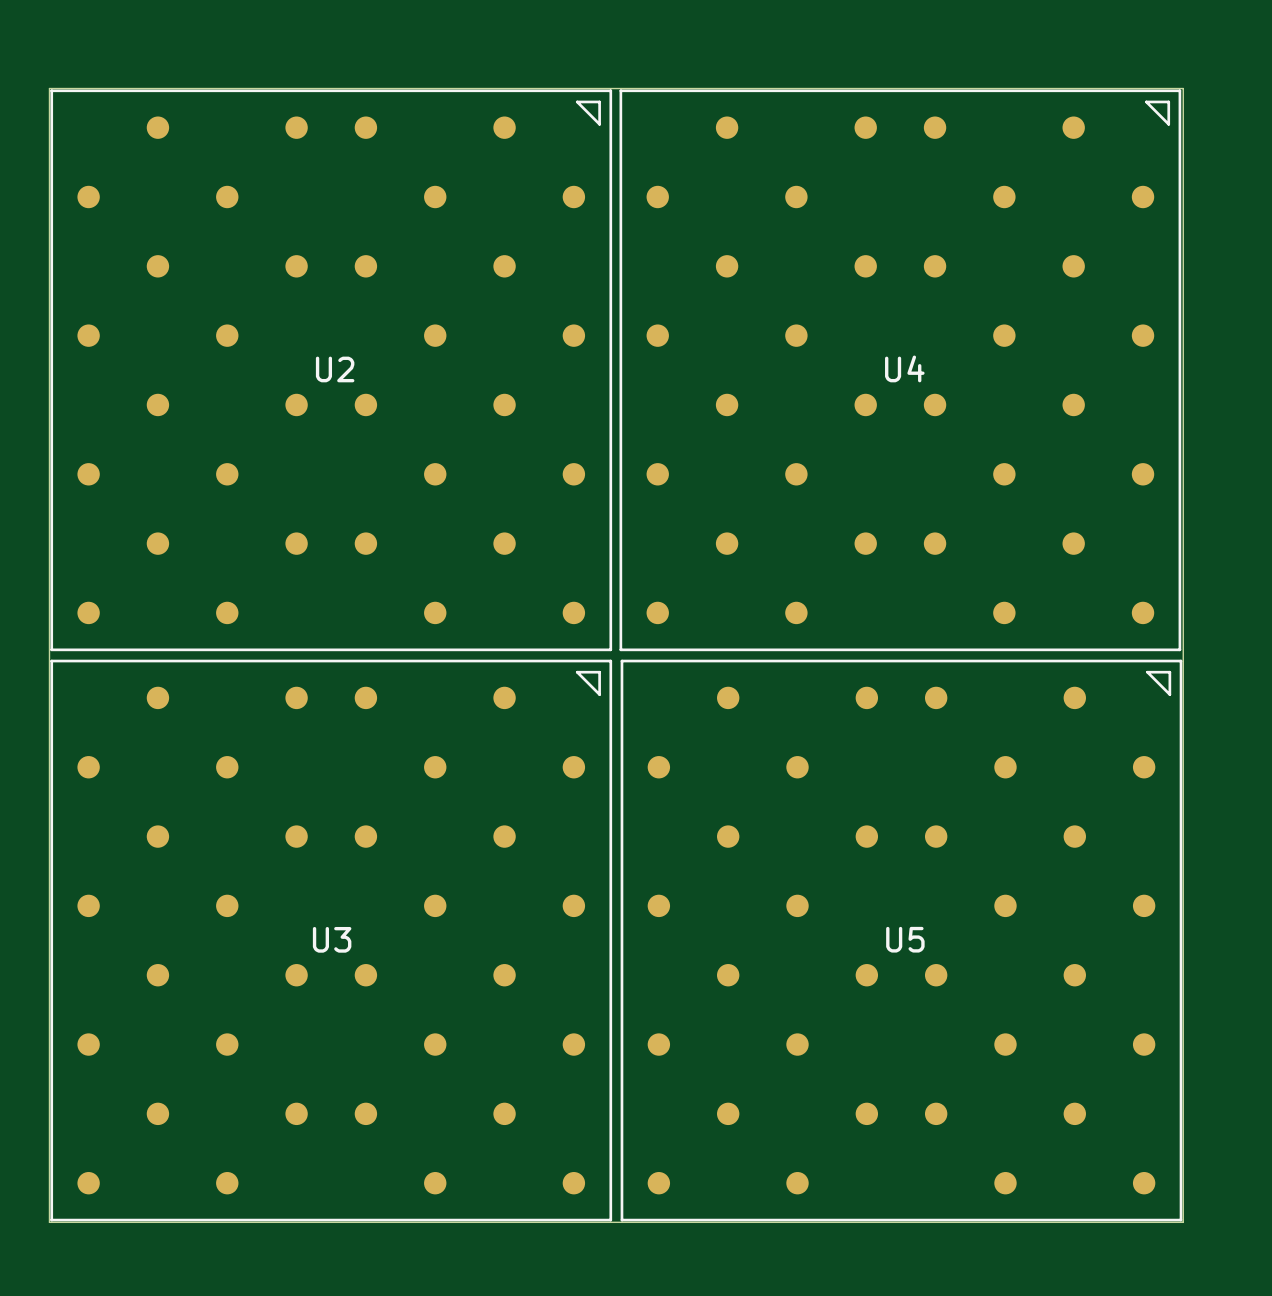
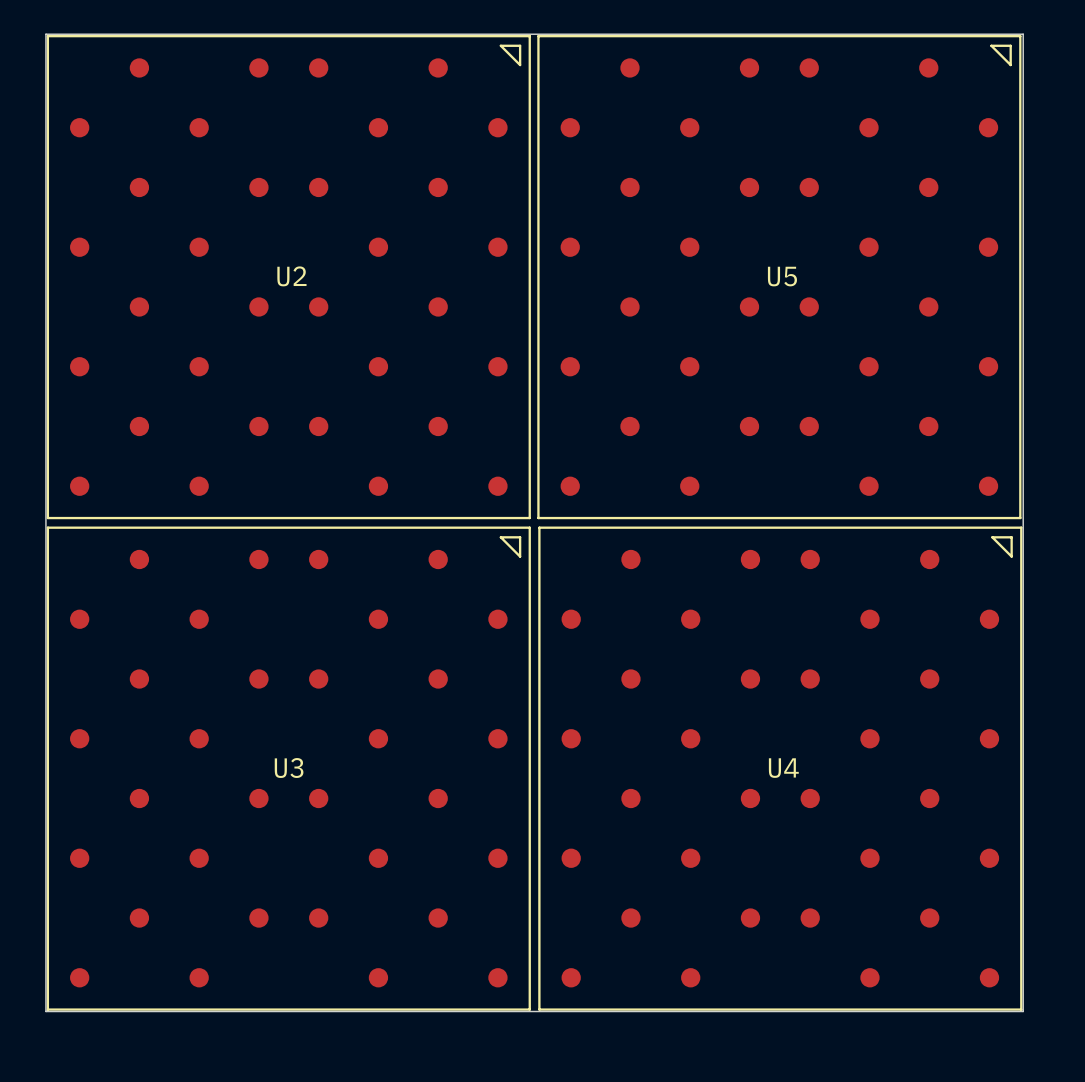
U4 name: U4 (904, 368) -> U5 (782, 276)
U5 name: U5 (905, 939) -> U4 (783, 768)

